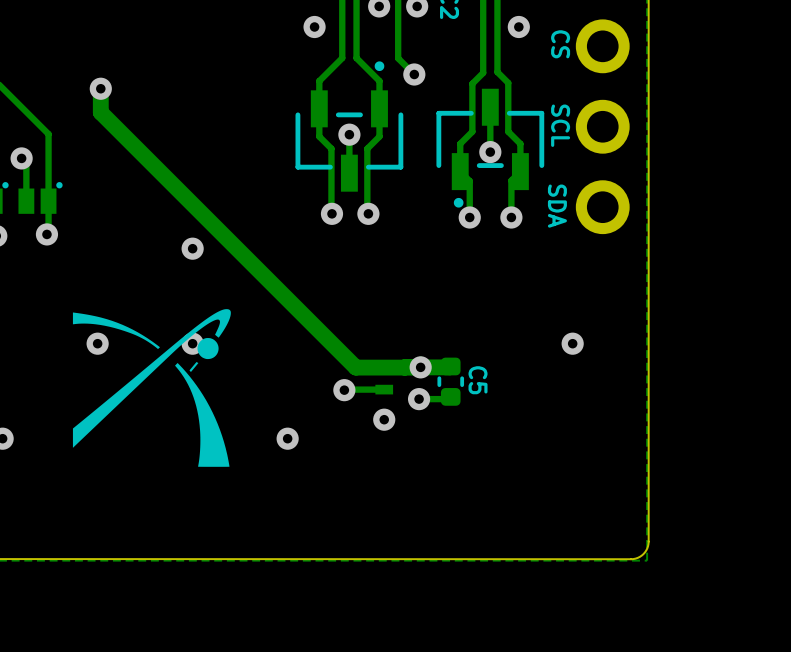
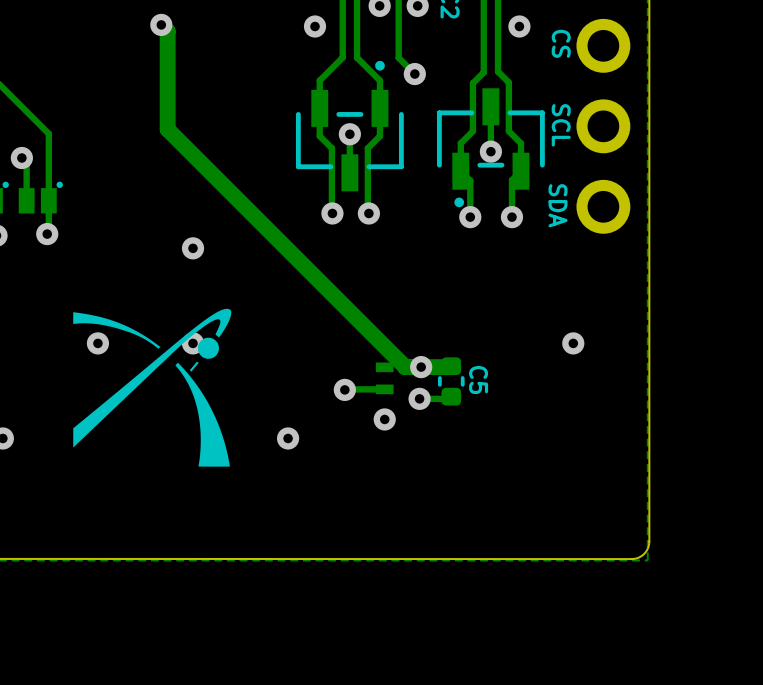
via: none -> (161, 24)
track: (100, 88) (100, 112) (355, 367) (404, 367) -> (161, 24) (167, 31) (167, 129) (405, 367)
via: (100, 88) -> none

